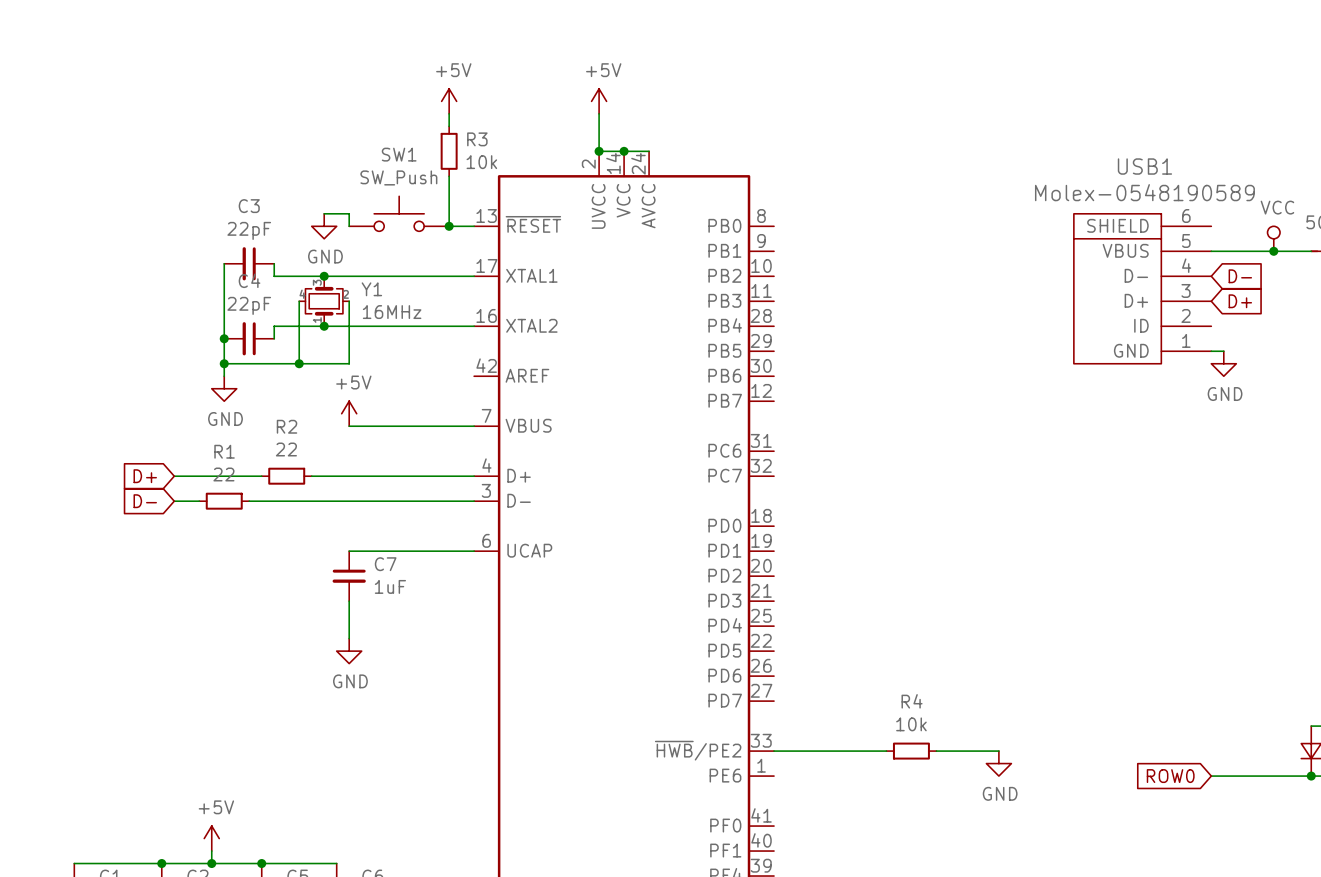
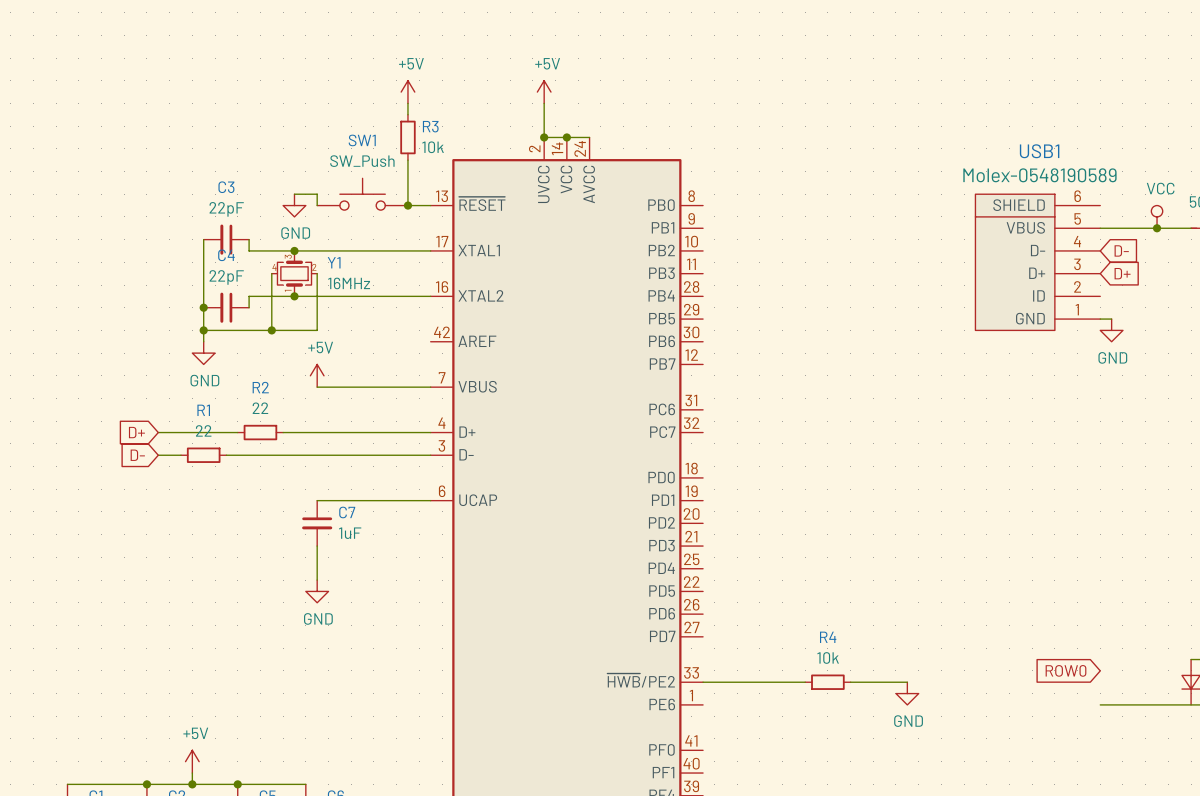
global label position: ROW0 (1170, 776) -> ROW0 (1065, 670)
junction: (1311, 776) -> none

